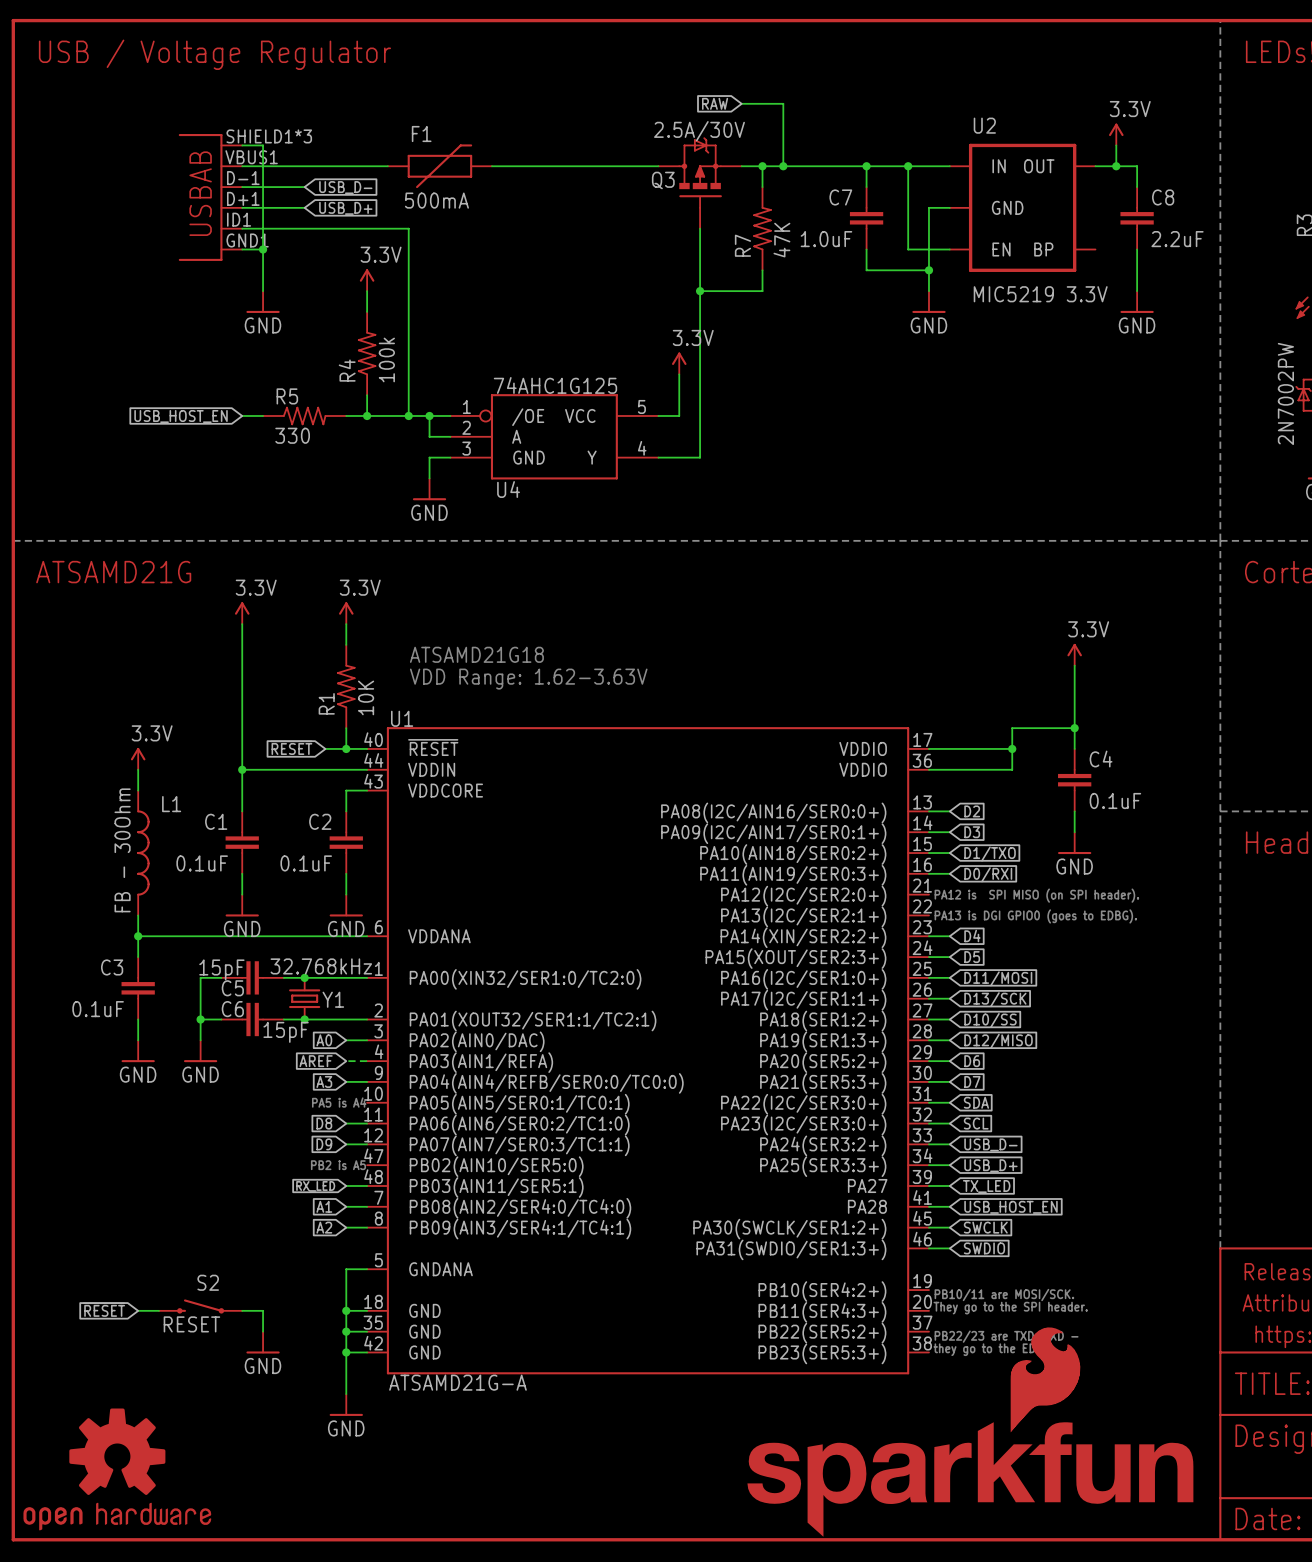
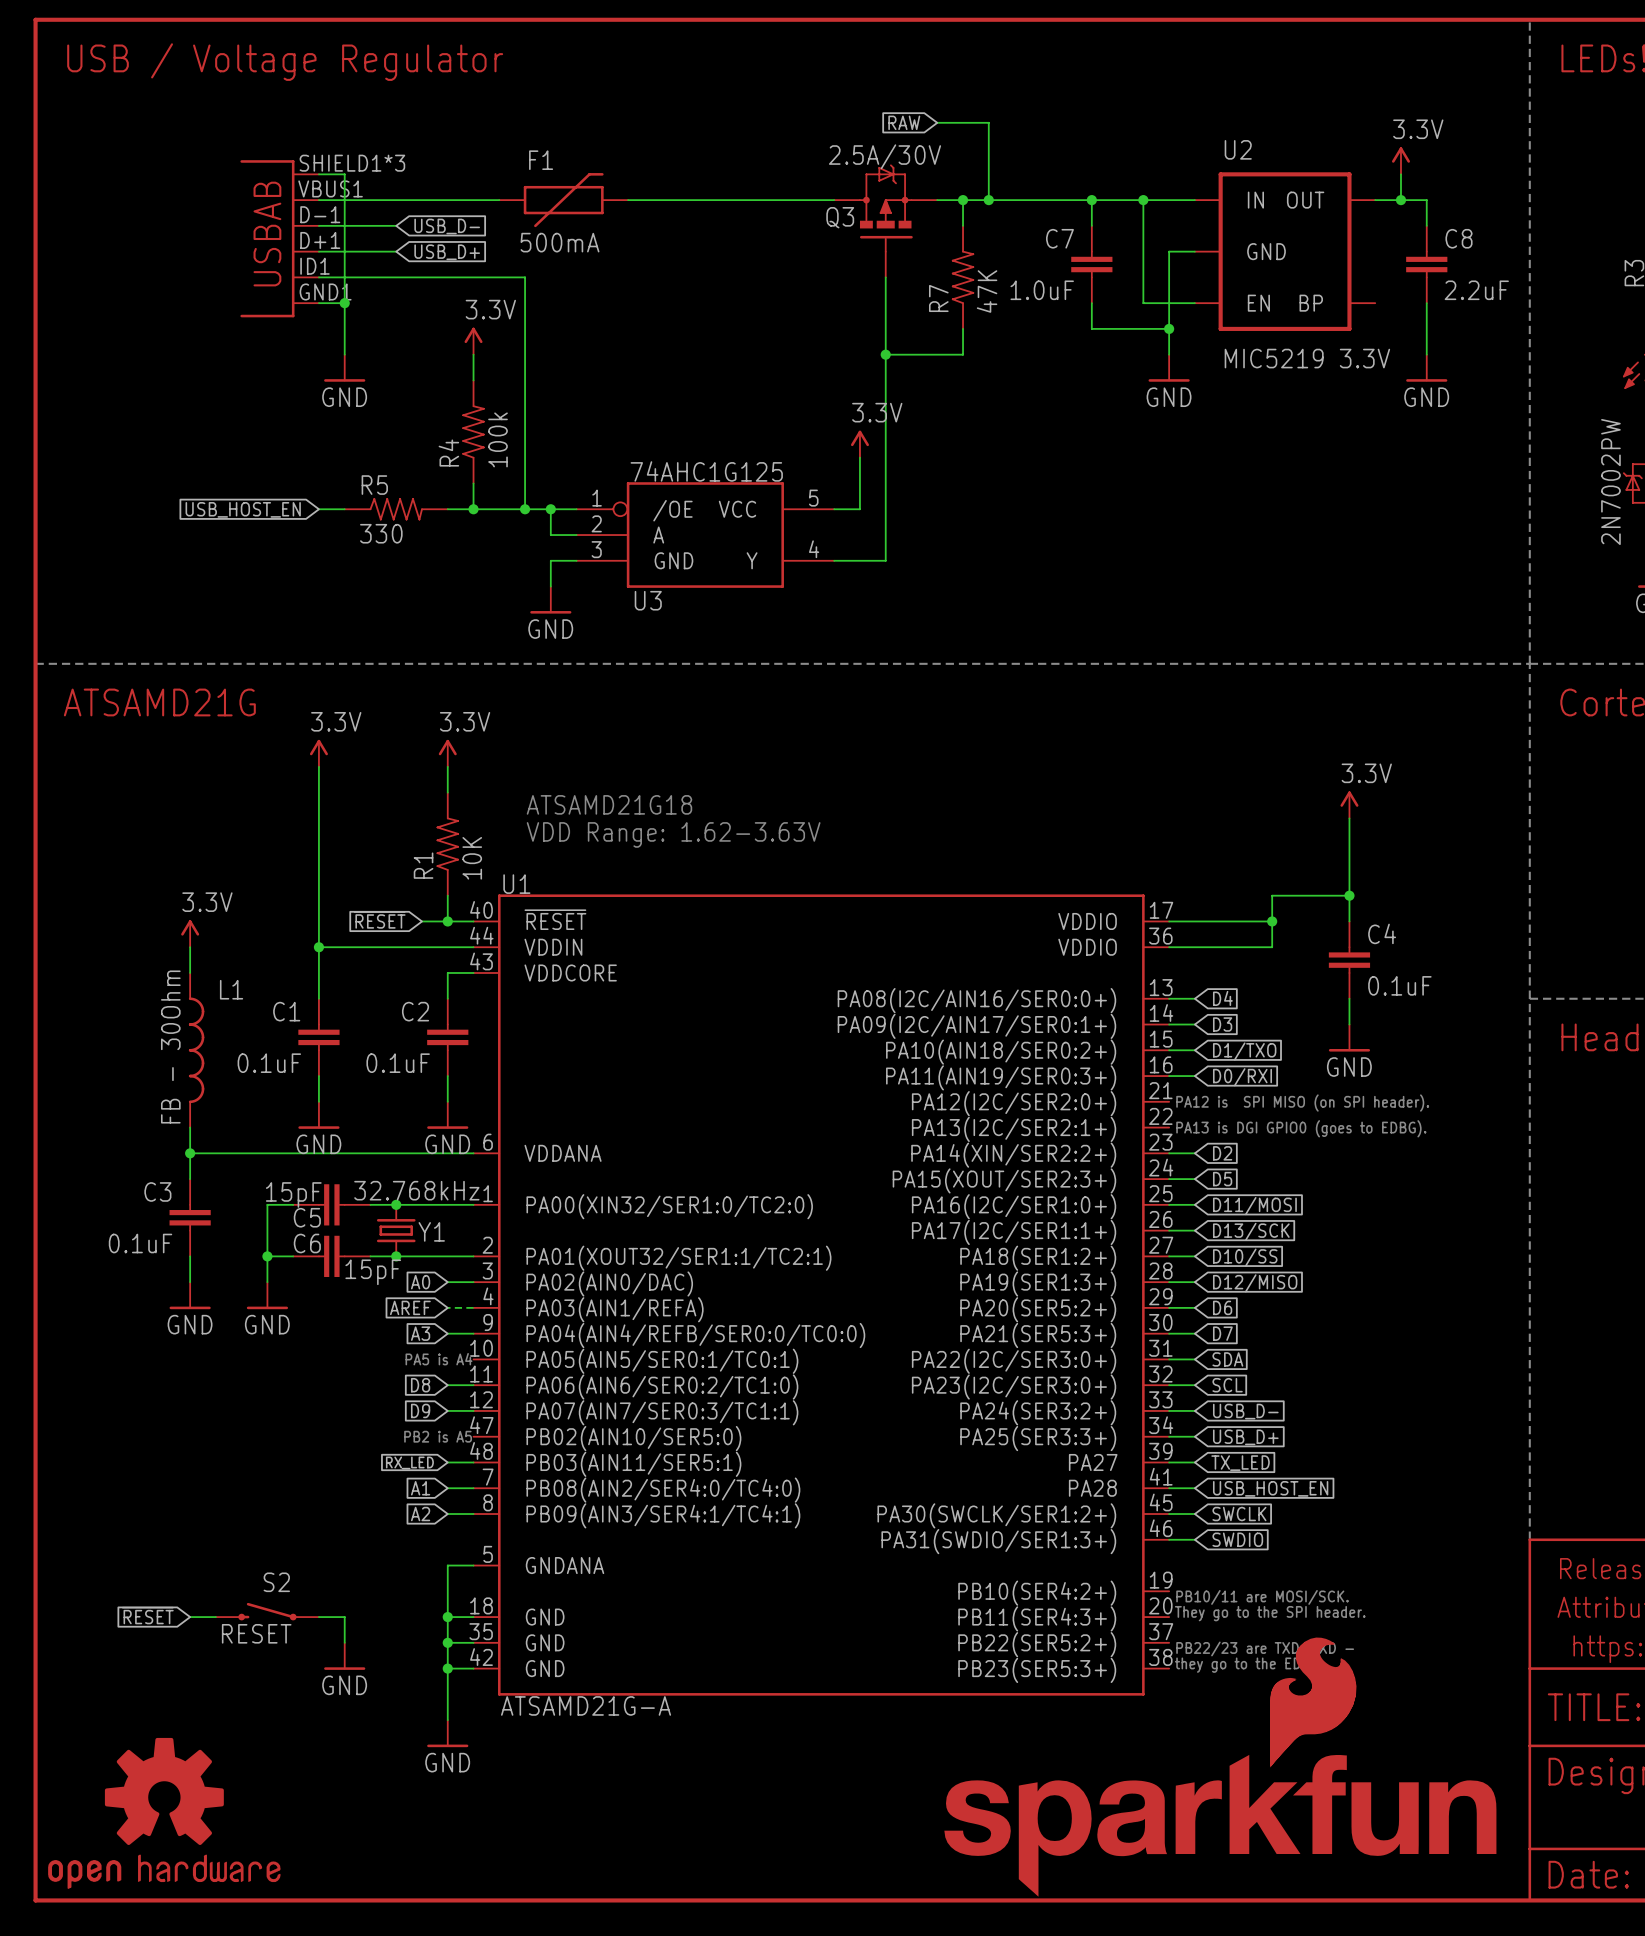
U4 name: U4 (508, 489) -> U3 (648, 600)
global label: D2 (972, 811) -> D4 (1222, 998)
global label: D4 (972, 936) -> D2 (1222, 1153)

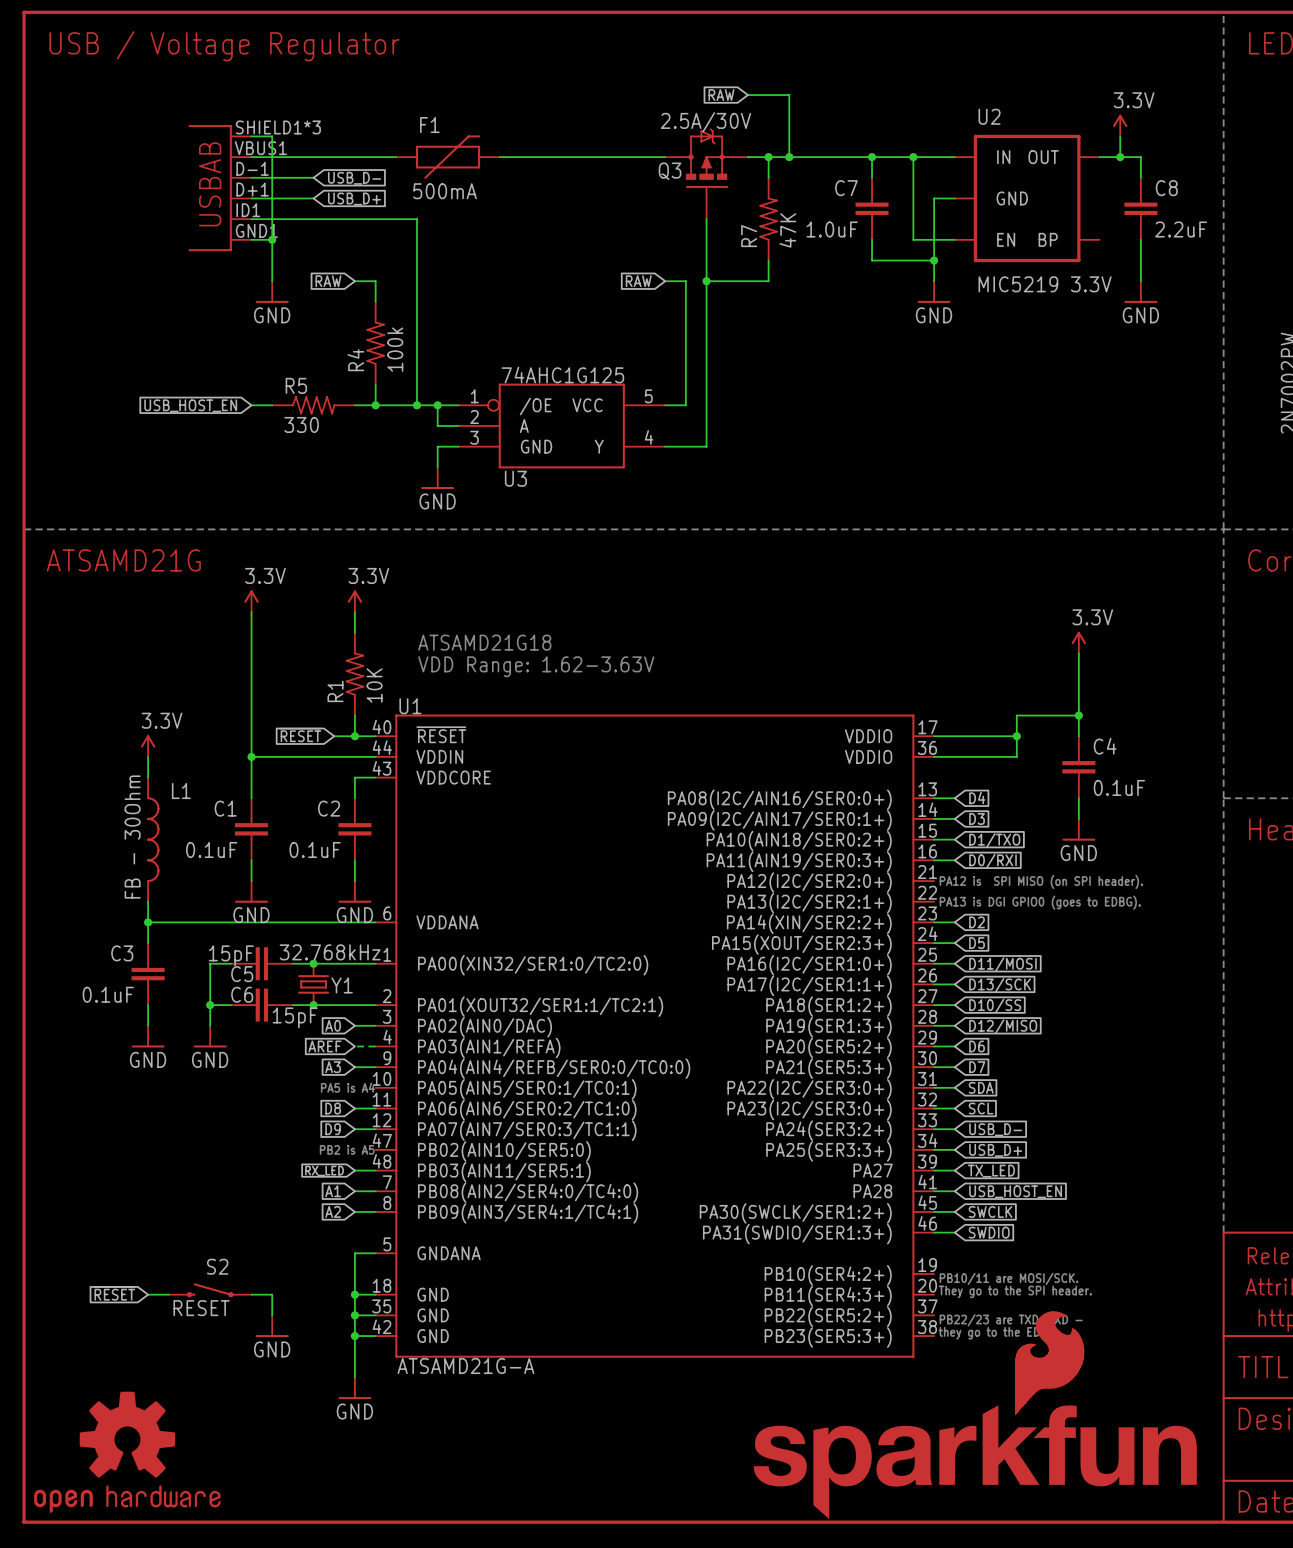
power symbol: 3.3V (473, 341) -> none
global label: none -> RAW (328, 281)
wire: none -> (354, 281) (375, 281)
global label: none -> RAW (638, 281)
wire: none -> (665, 281) (685, 281) (685, 363)
power symbol: 3.3V (859, 444) -> none

